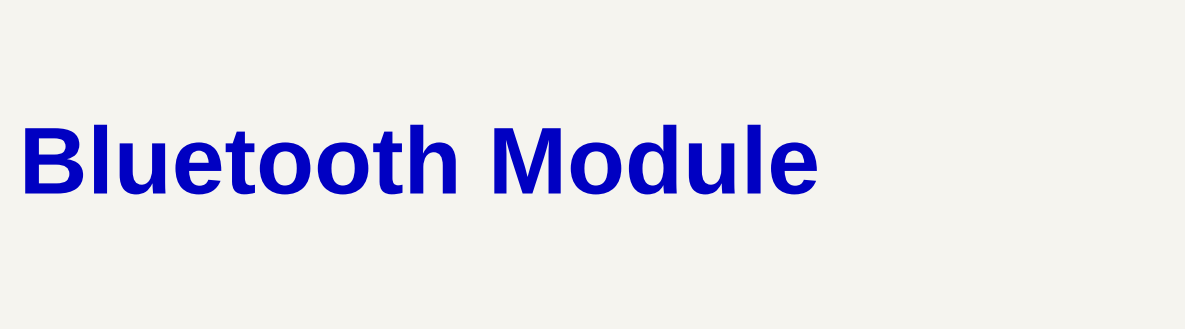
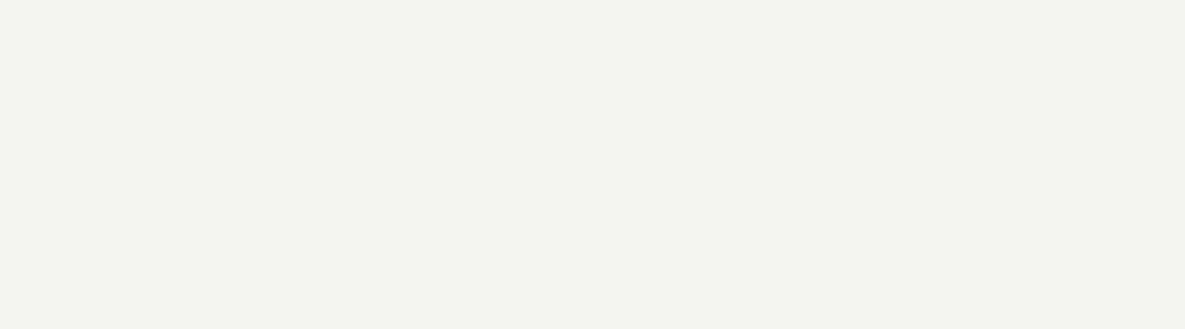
text: Bluetooth Module (421, 159) -> none

